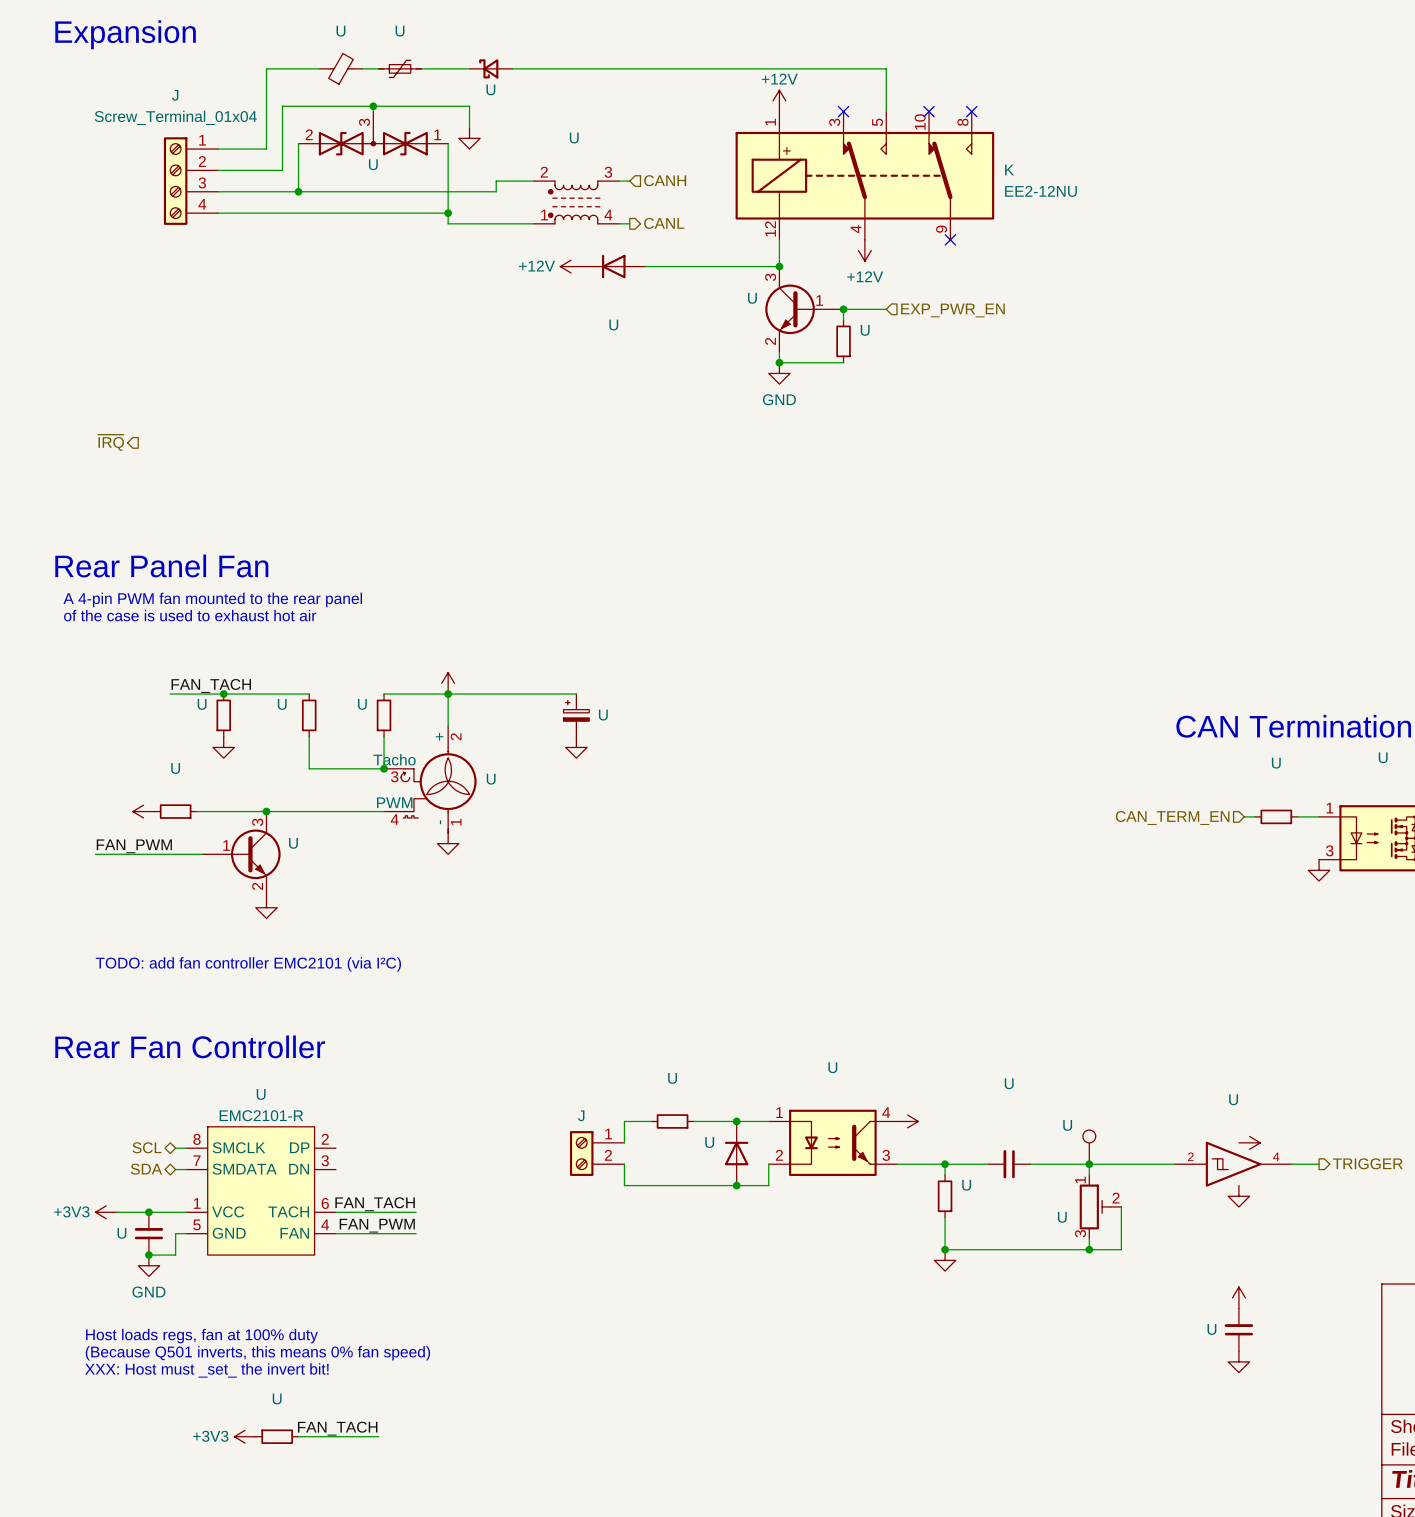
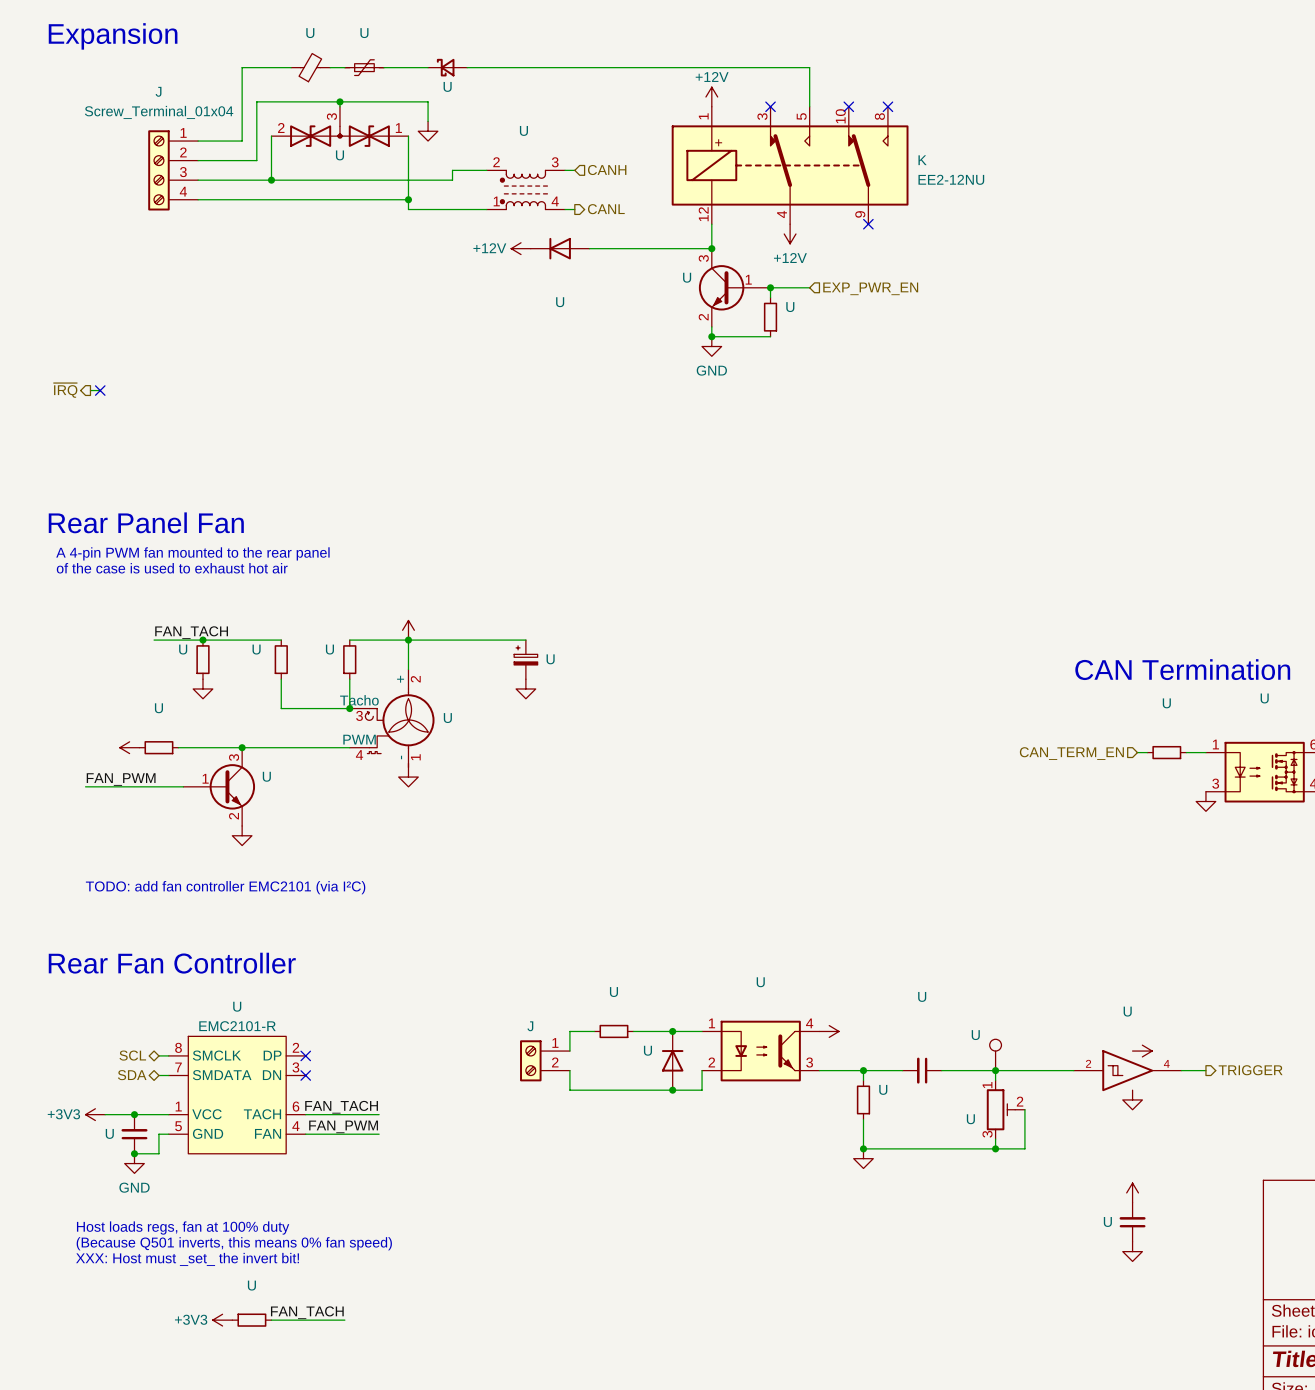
wire: none -> (90, 390) (100, 390)
no-connect mark: none -> (100, 390)
hierarchical label position: ~{IRQ} (111, 442) -> ~{IRQ} (65, 390)
no-connect mark: none -> (305, 1055)
no-connect mark: none -> (305, 1075)

